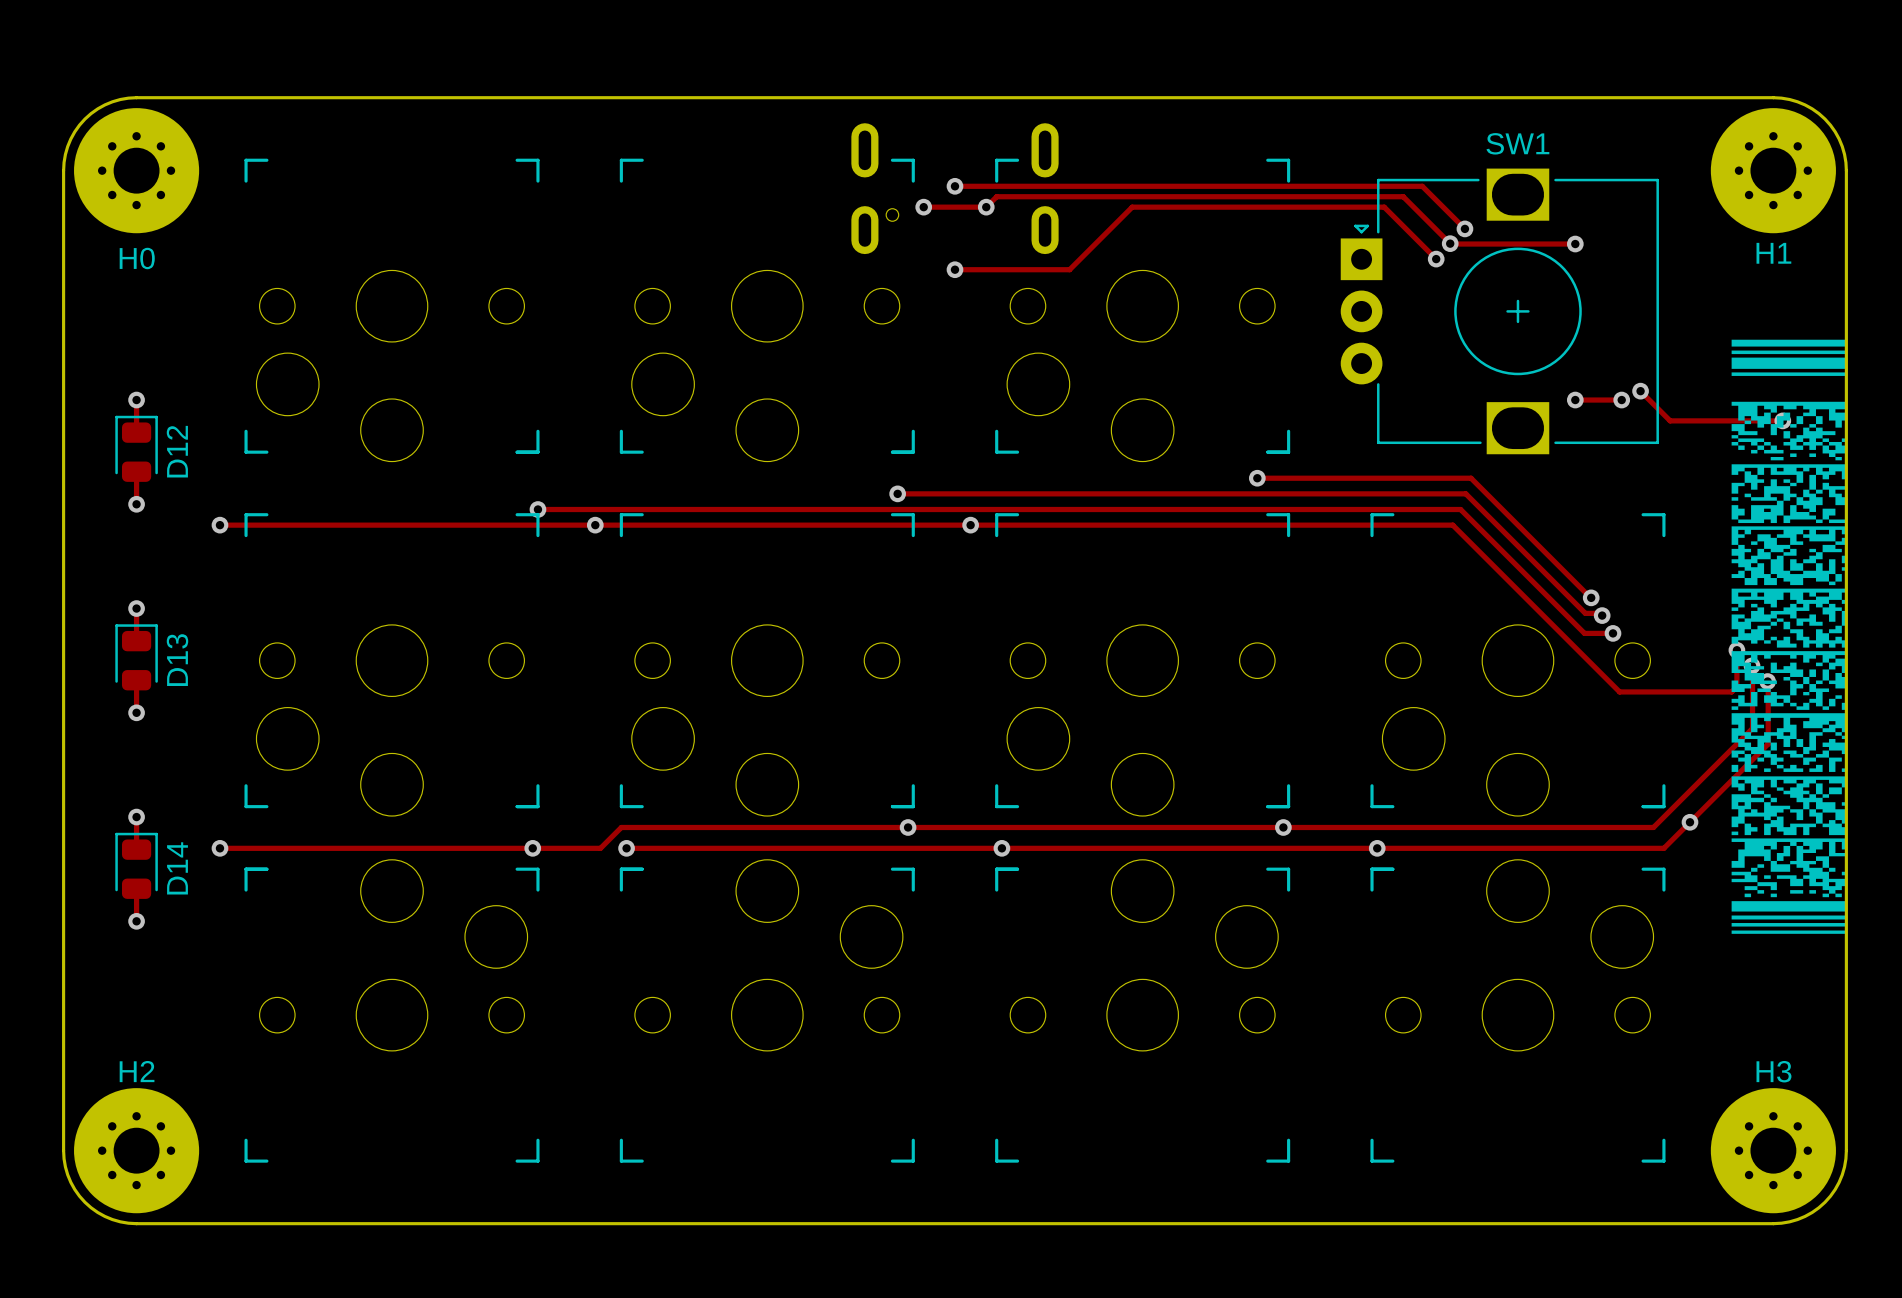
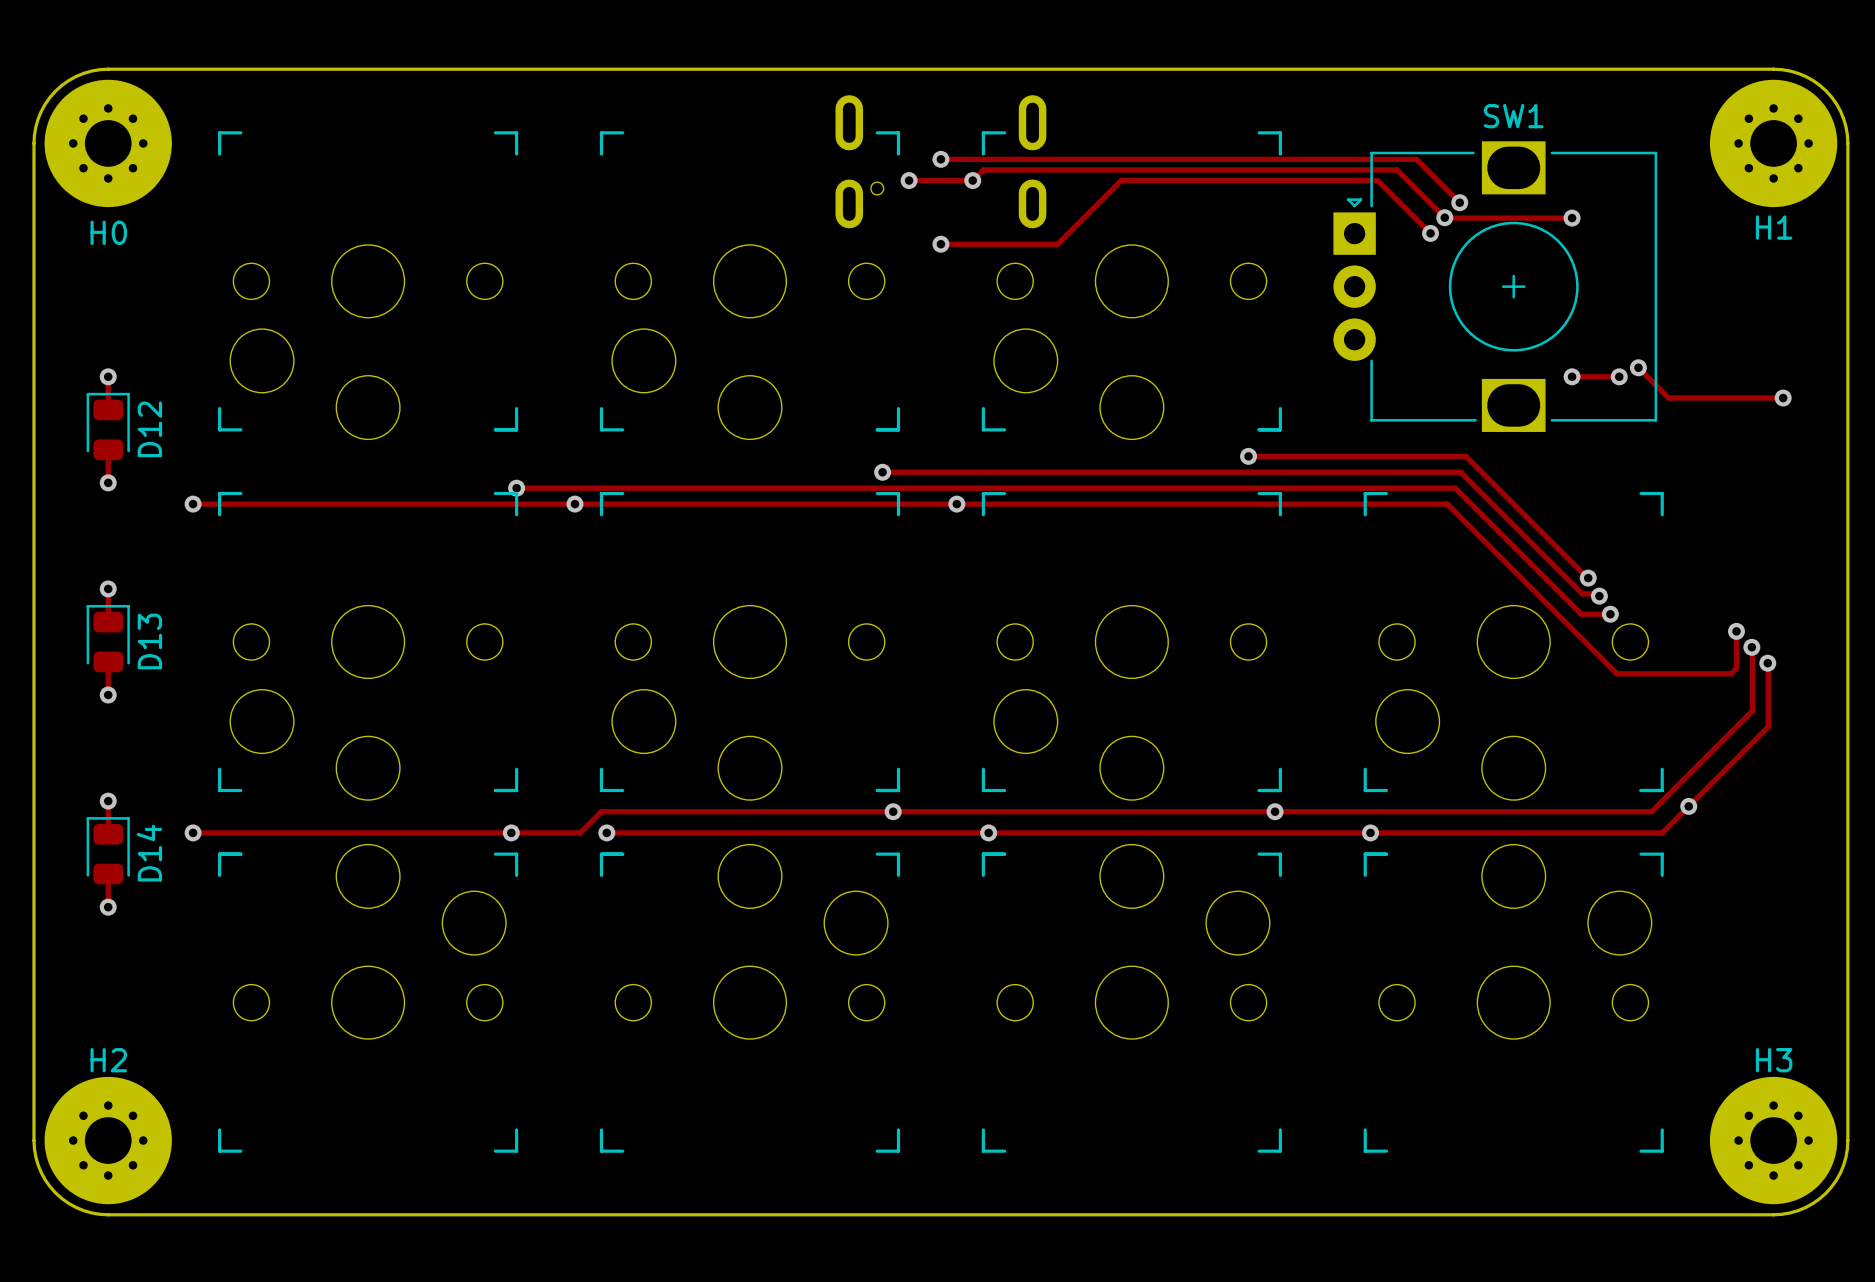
drawing: [1731, 339, 1847, 934] -> none

